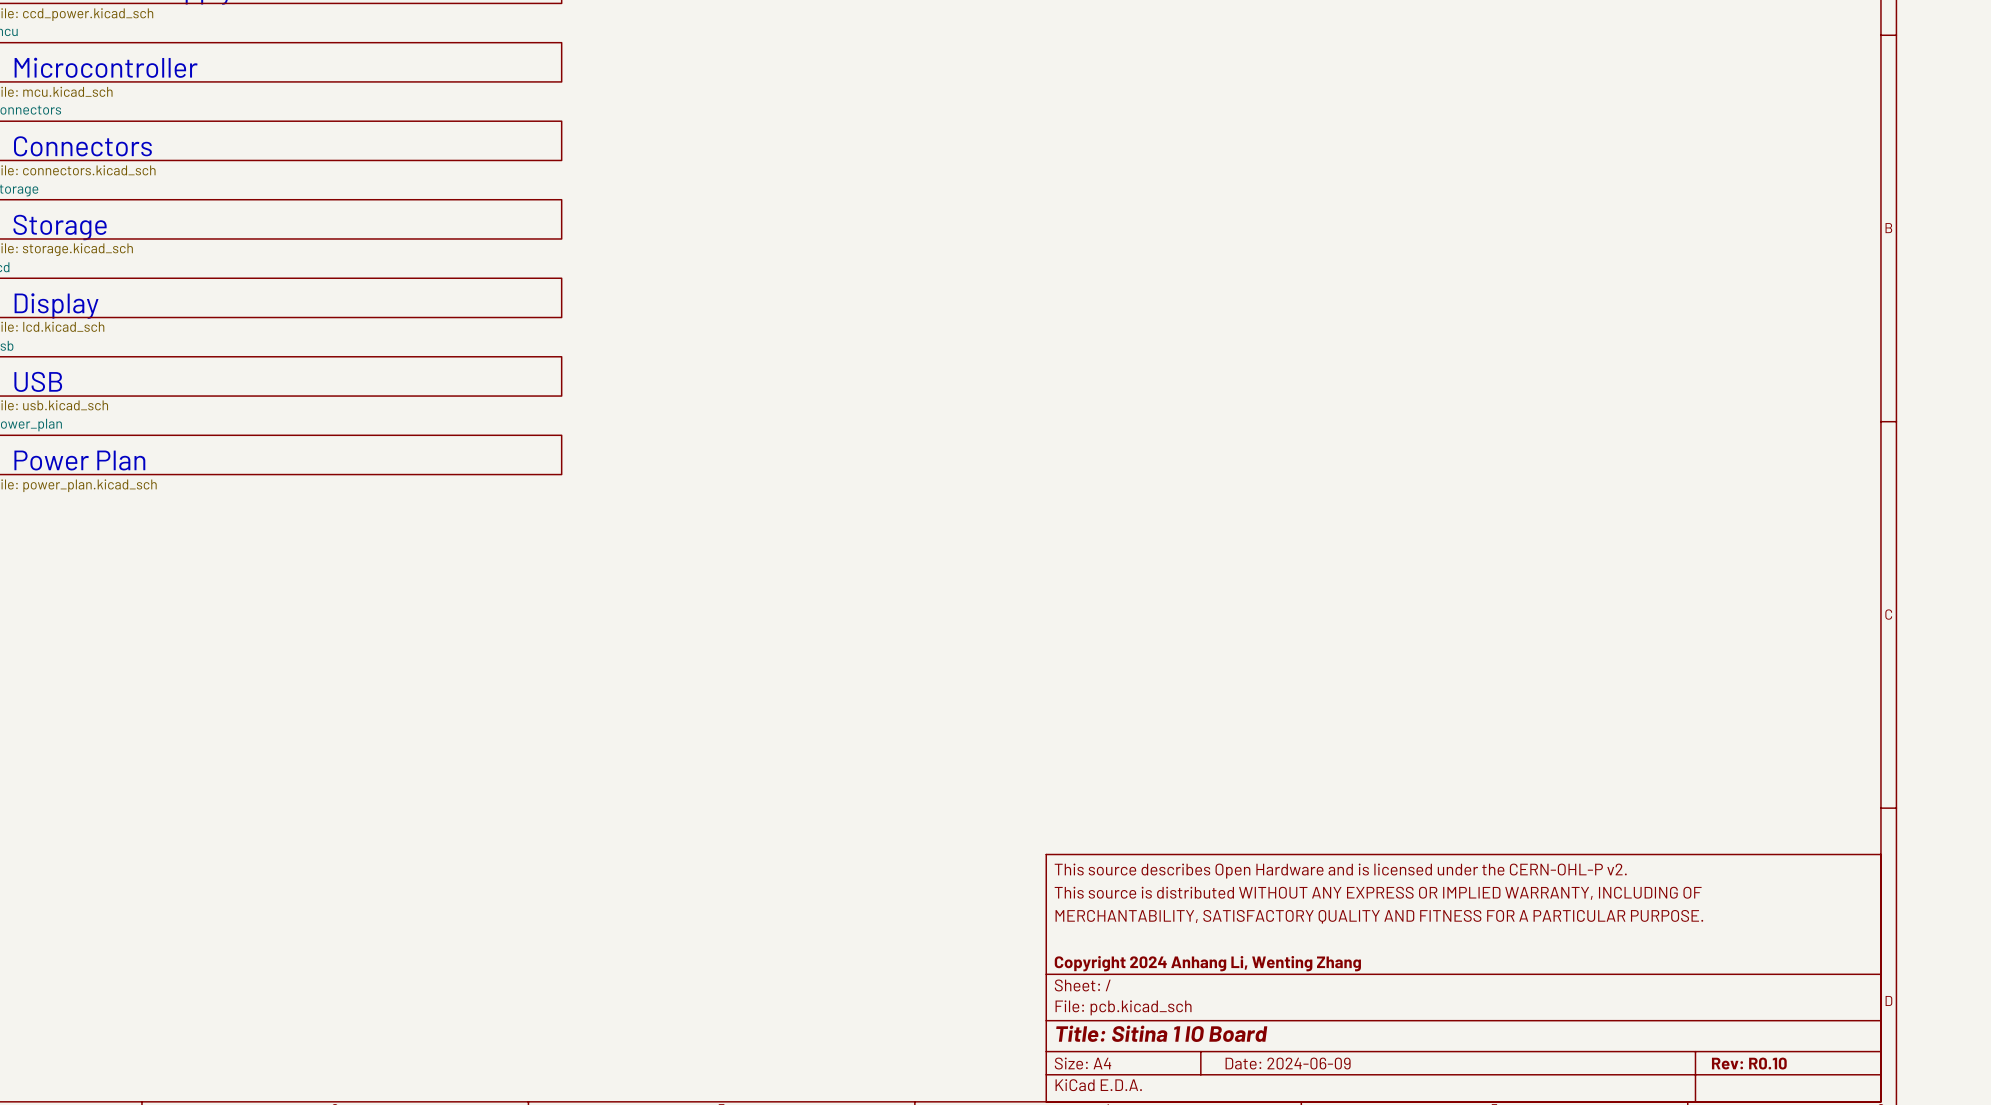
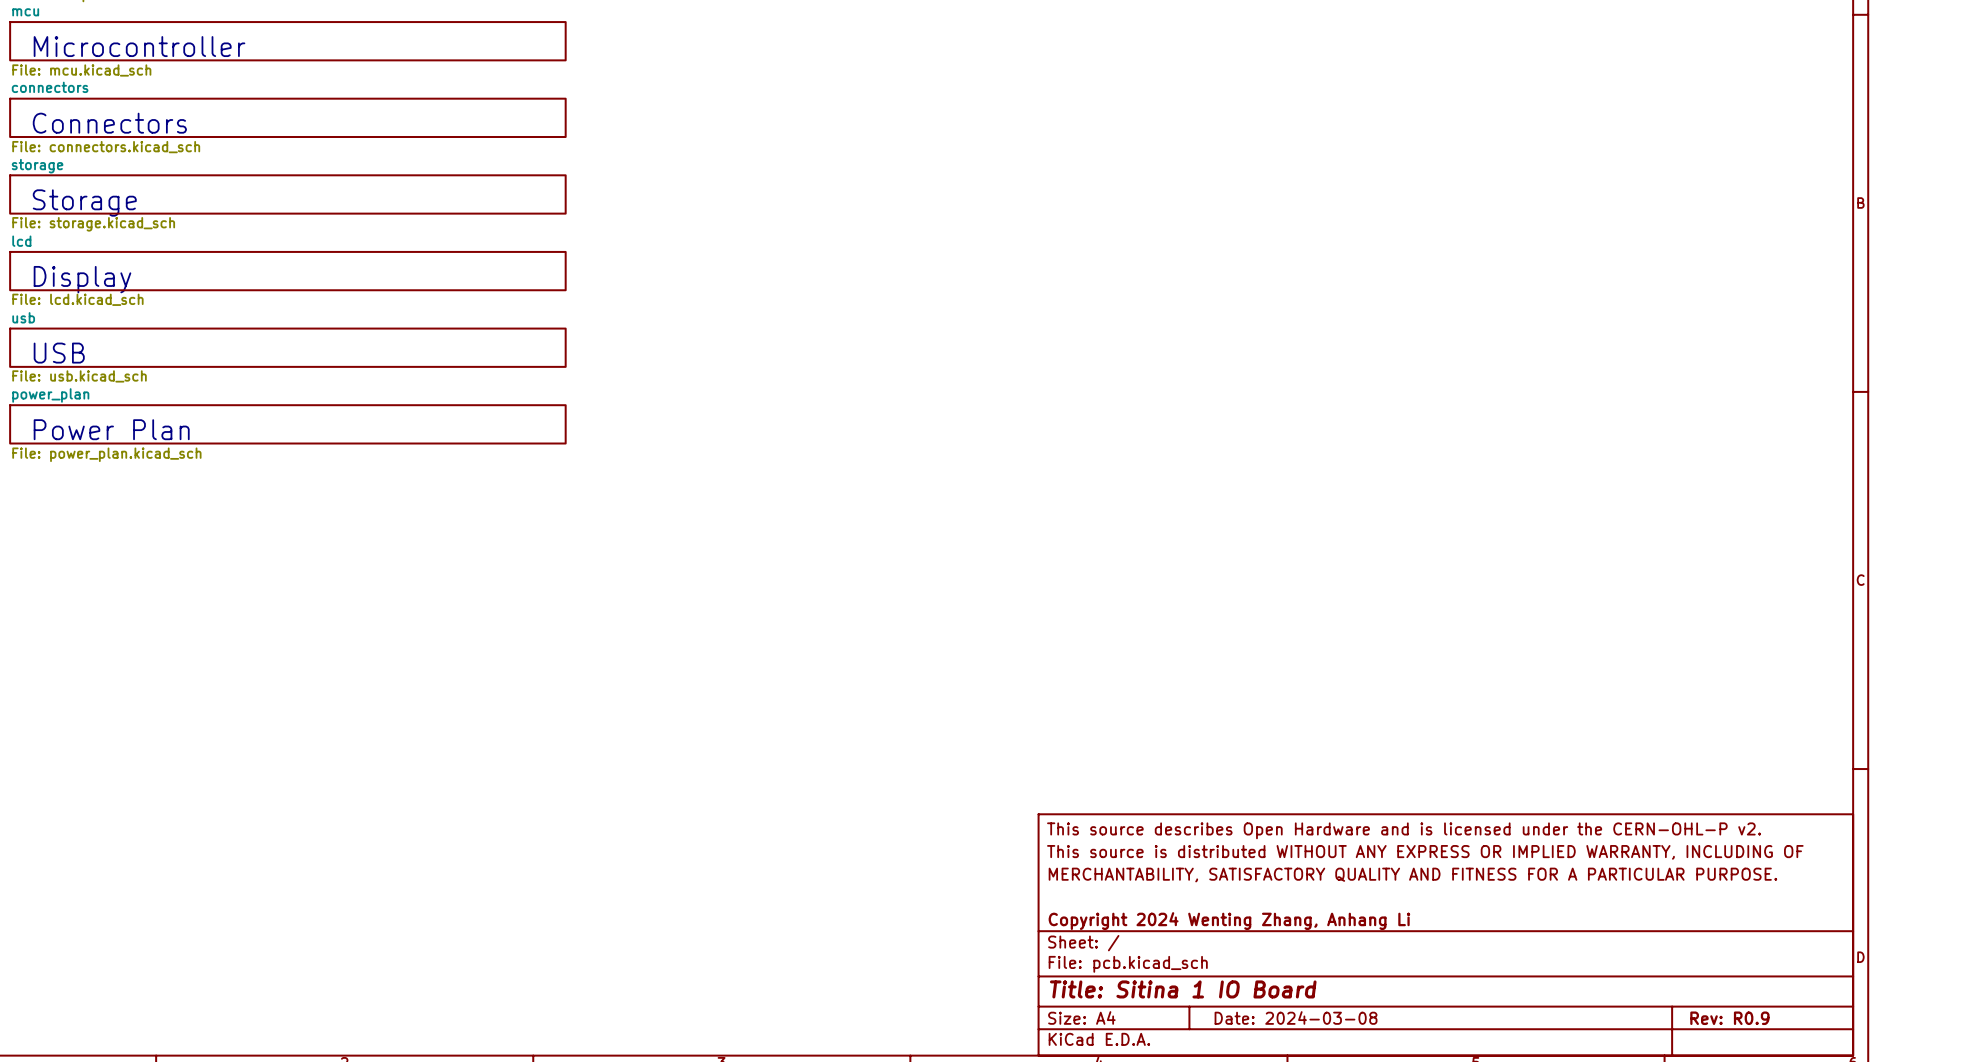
title block: Copyright 2024 Anhang Li, Wenting Zhang (1207, 963) -> Copyright 2024 Wenting Zhang, Anhang Li (1229, 921)
title block: Date: 2024-06-09 (1288, 1063) -> Date: 2024-03-08 (1296, 1017)
title block: Rev: R0.10 (1749, 1063) -> Rev: R0.9 (1729, 1018)

